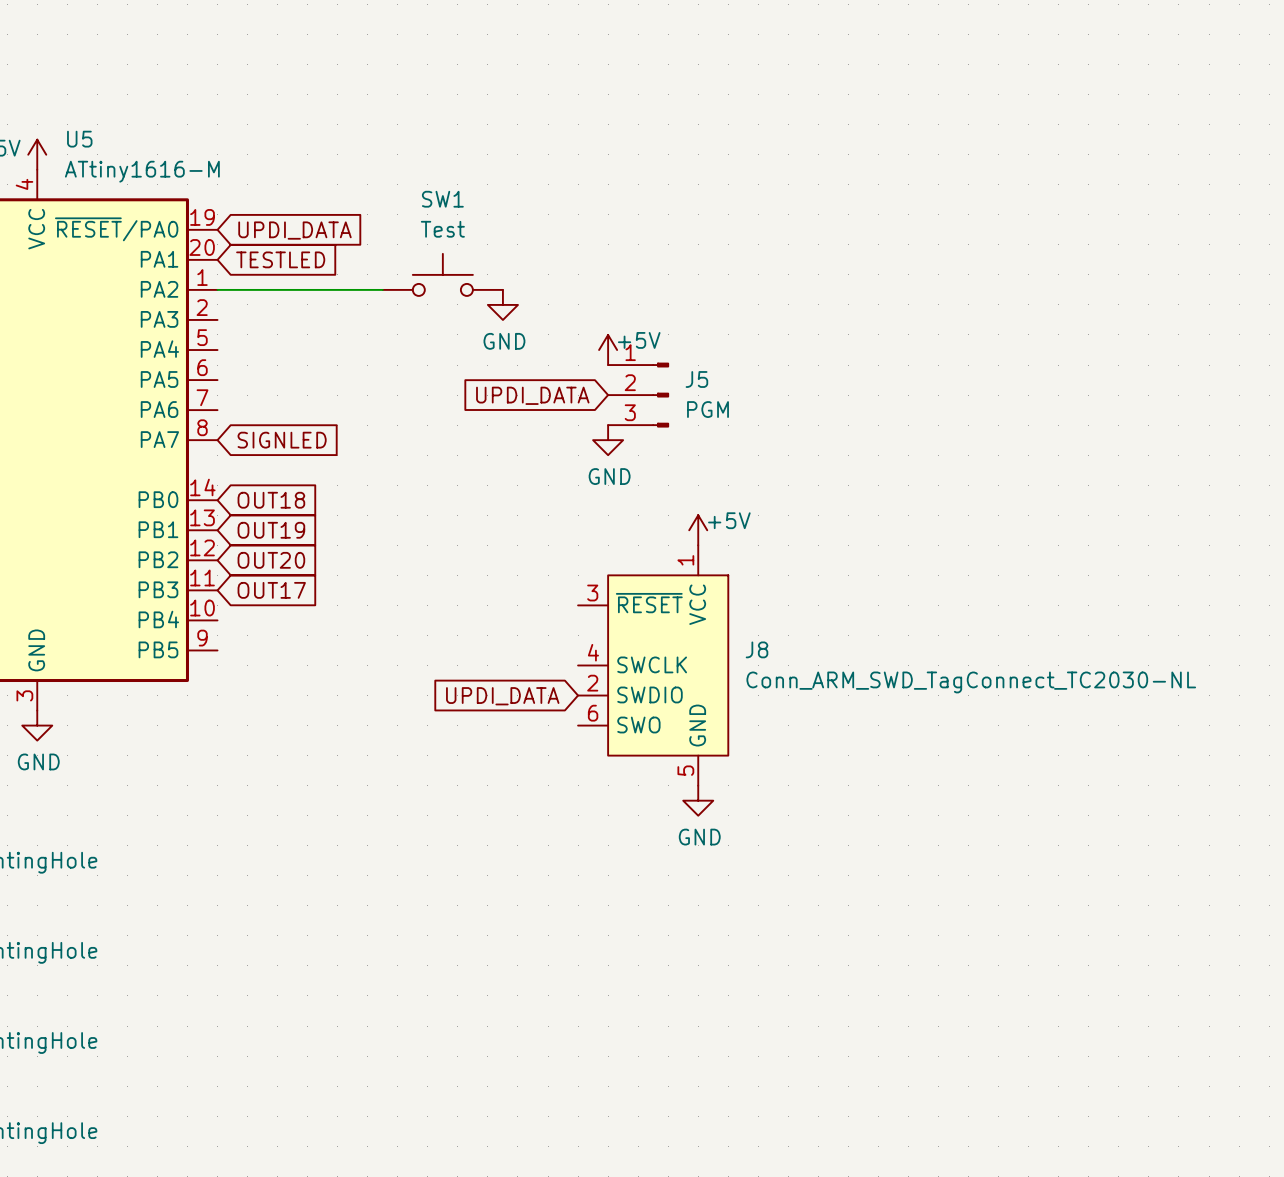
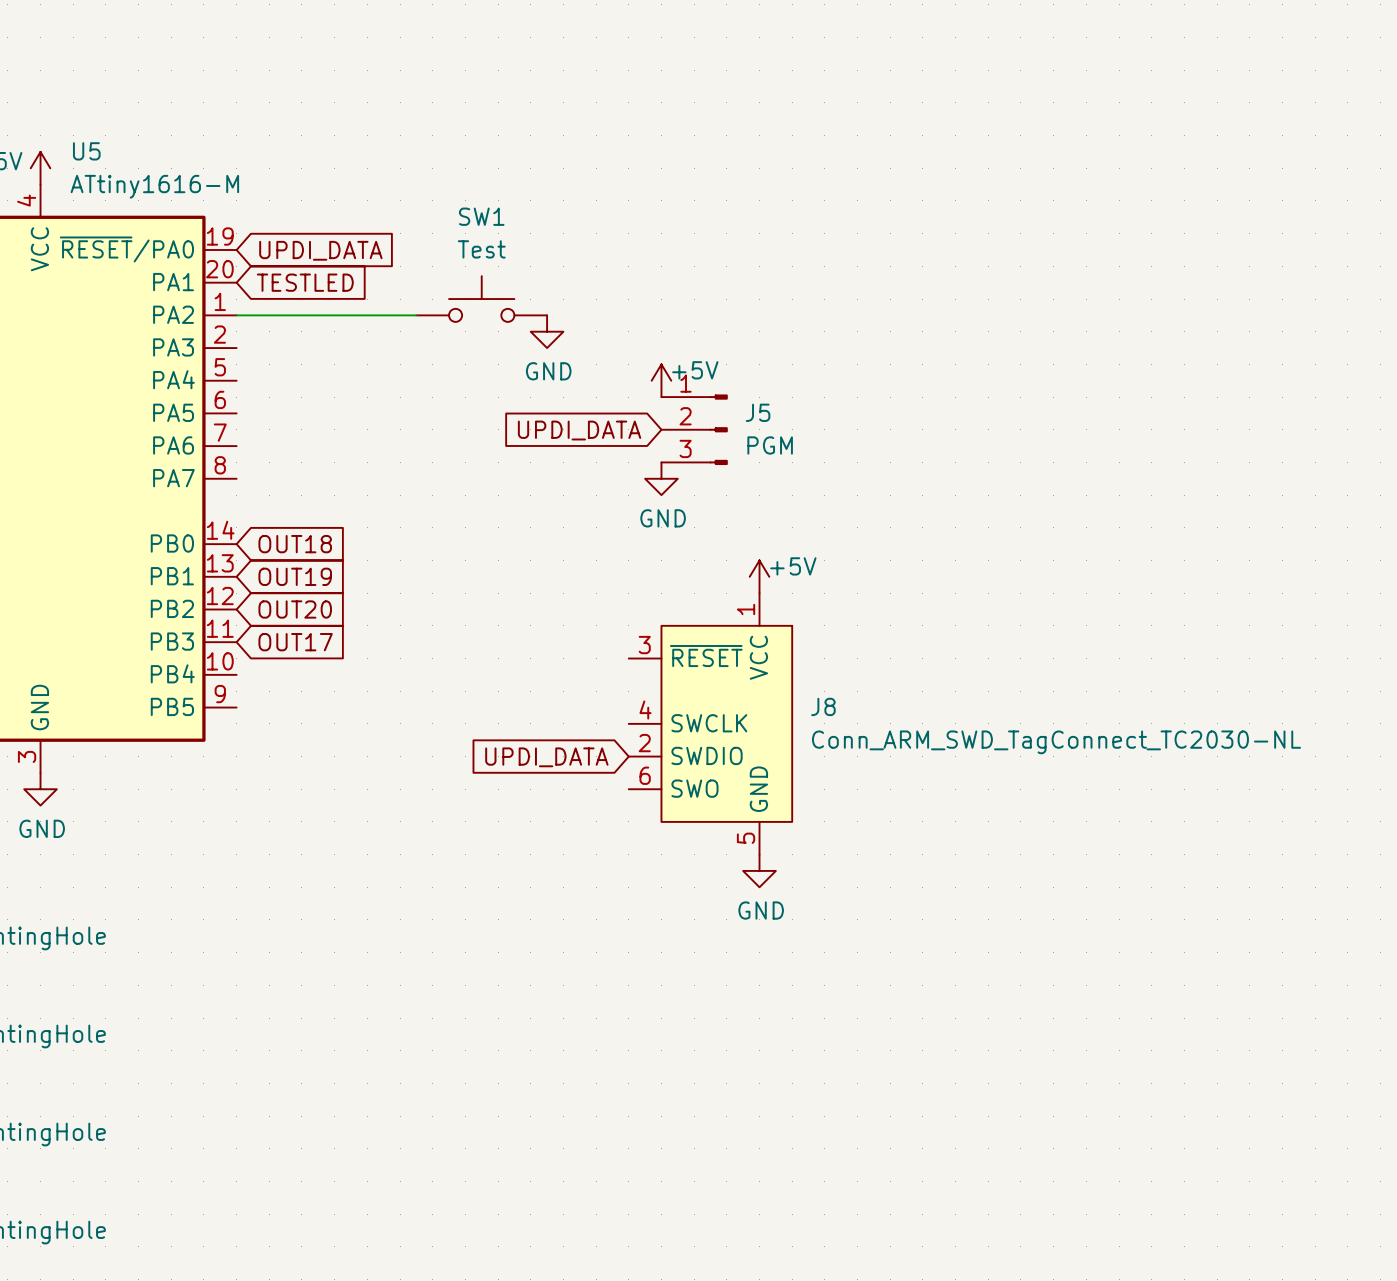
global label: SIGNLED (282, 440) -> none

